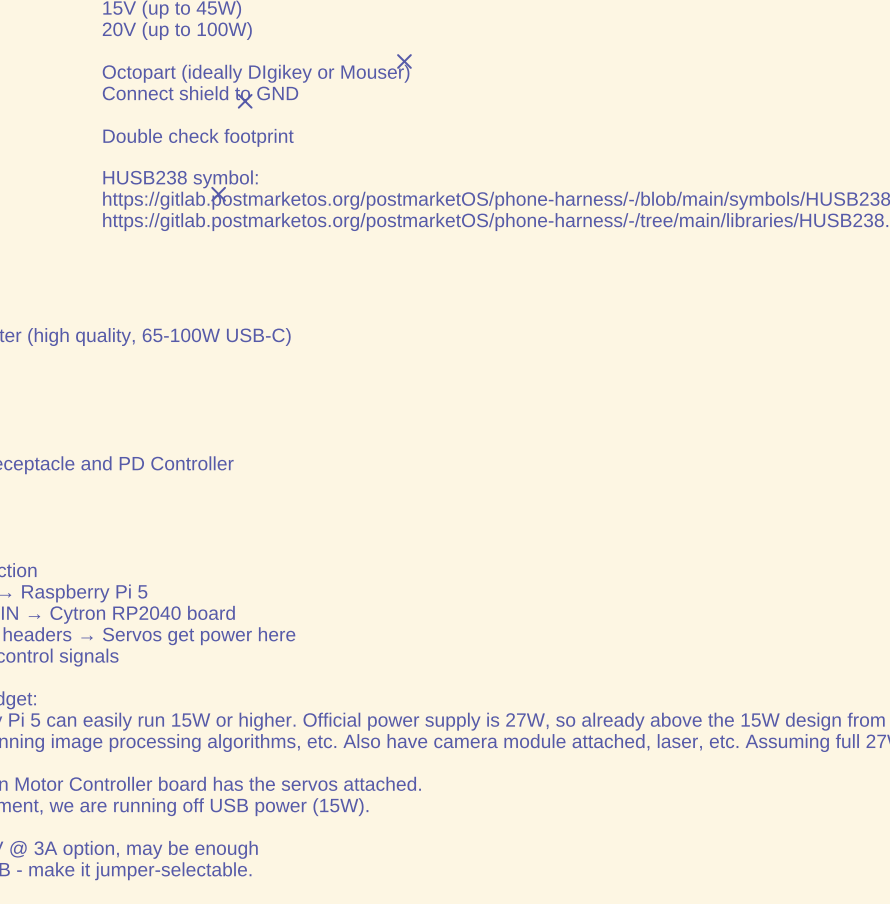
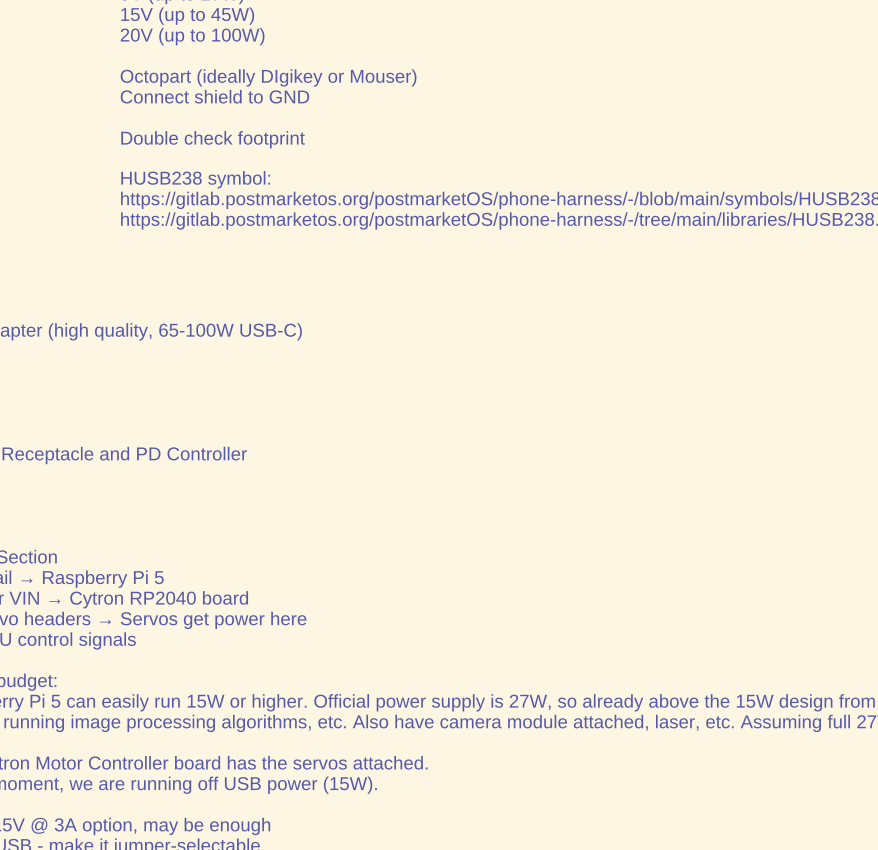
no-connect mark: (404, 61) -> none
no-connect mark: (245, 101) -> none
no-connect mark: (218, 194) -> none

